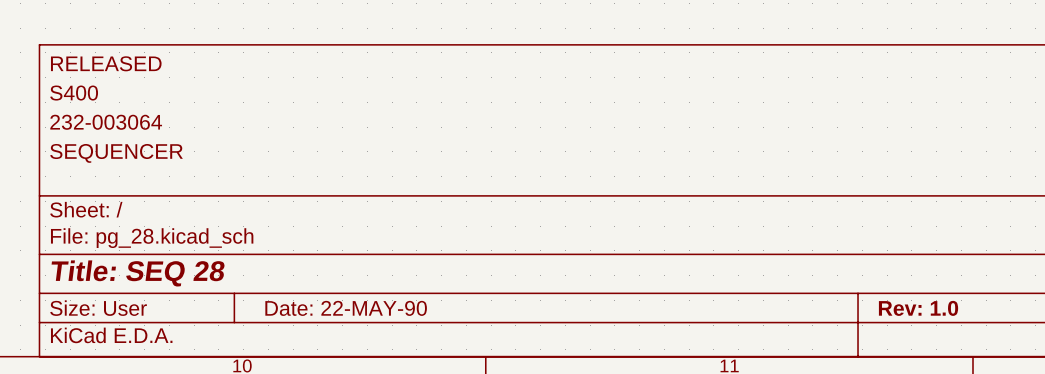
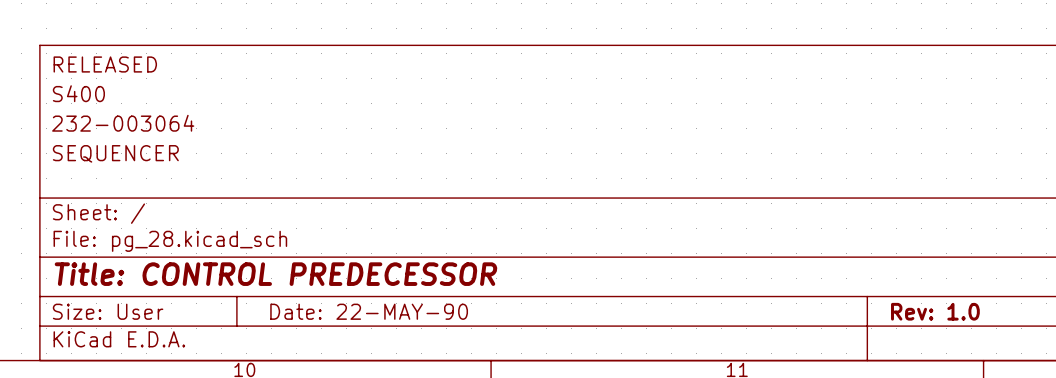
title block: Title: SEQ 28 (138, 273) -> Title: CONTROL PREDECESSOR (275, 274)

